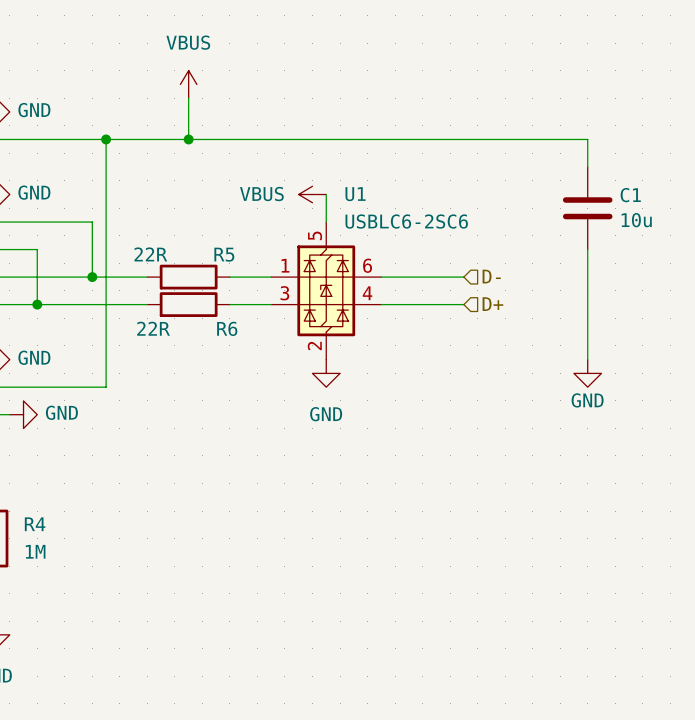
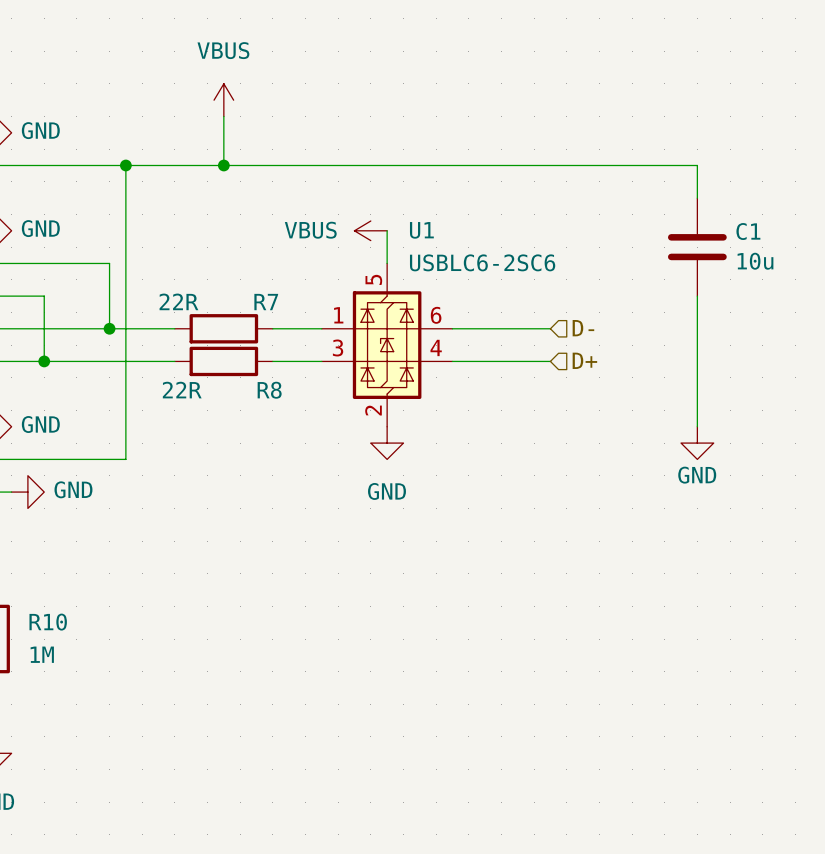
R5 name: R5 (224, 254) -> R7 (266, 302)
R6 name: R6 (227, 328) -> R8 (269, 390)
R4 name: R4 (35, 524) -> R10 (48, 622)

